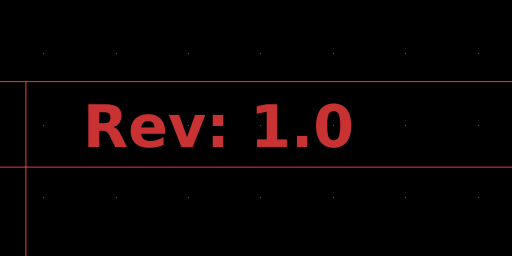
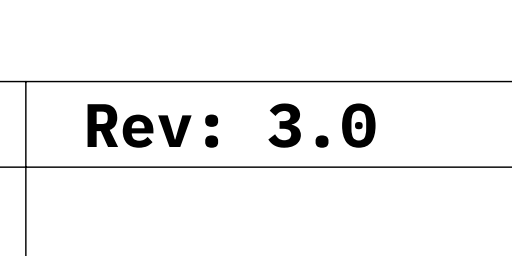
title block: Rev: 1.0 (219, 125) -> Rev: 3.0 (231, 125)

